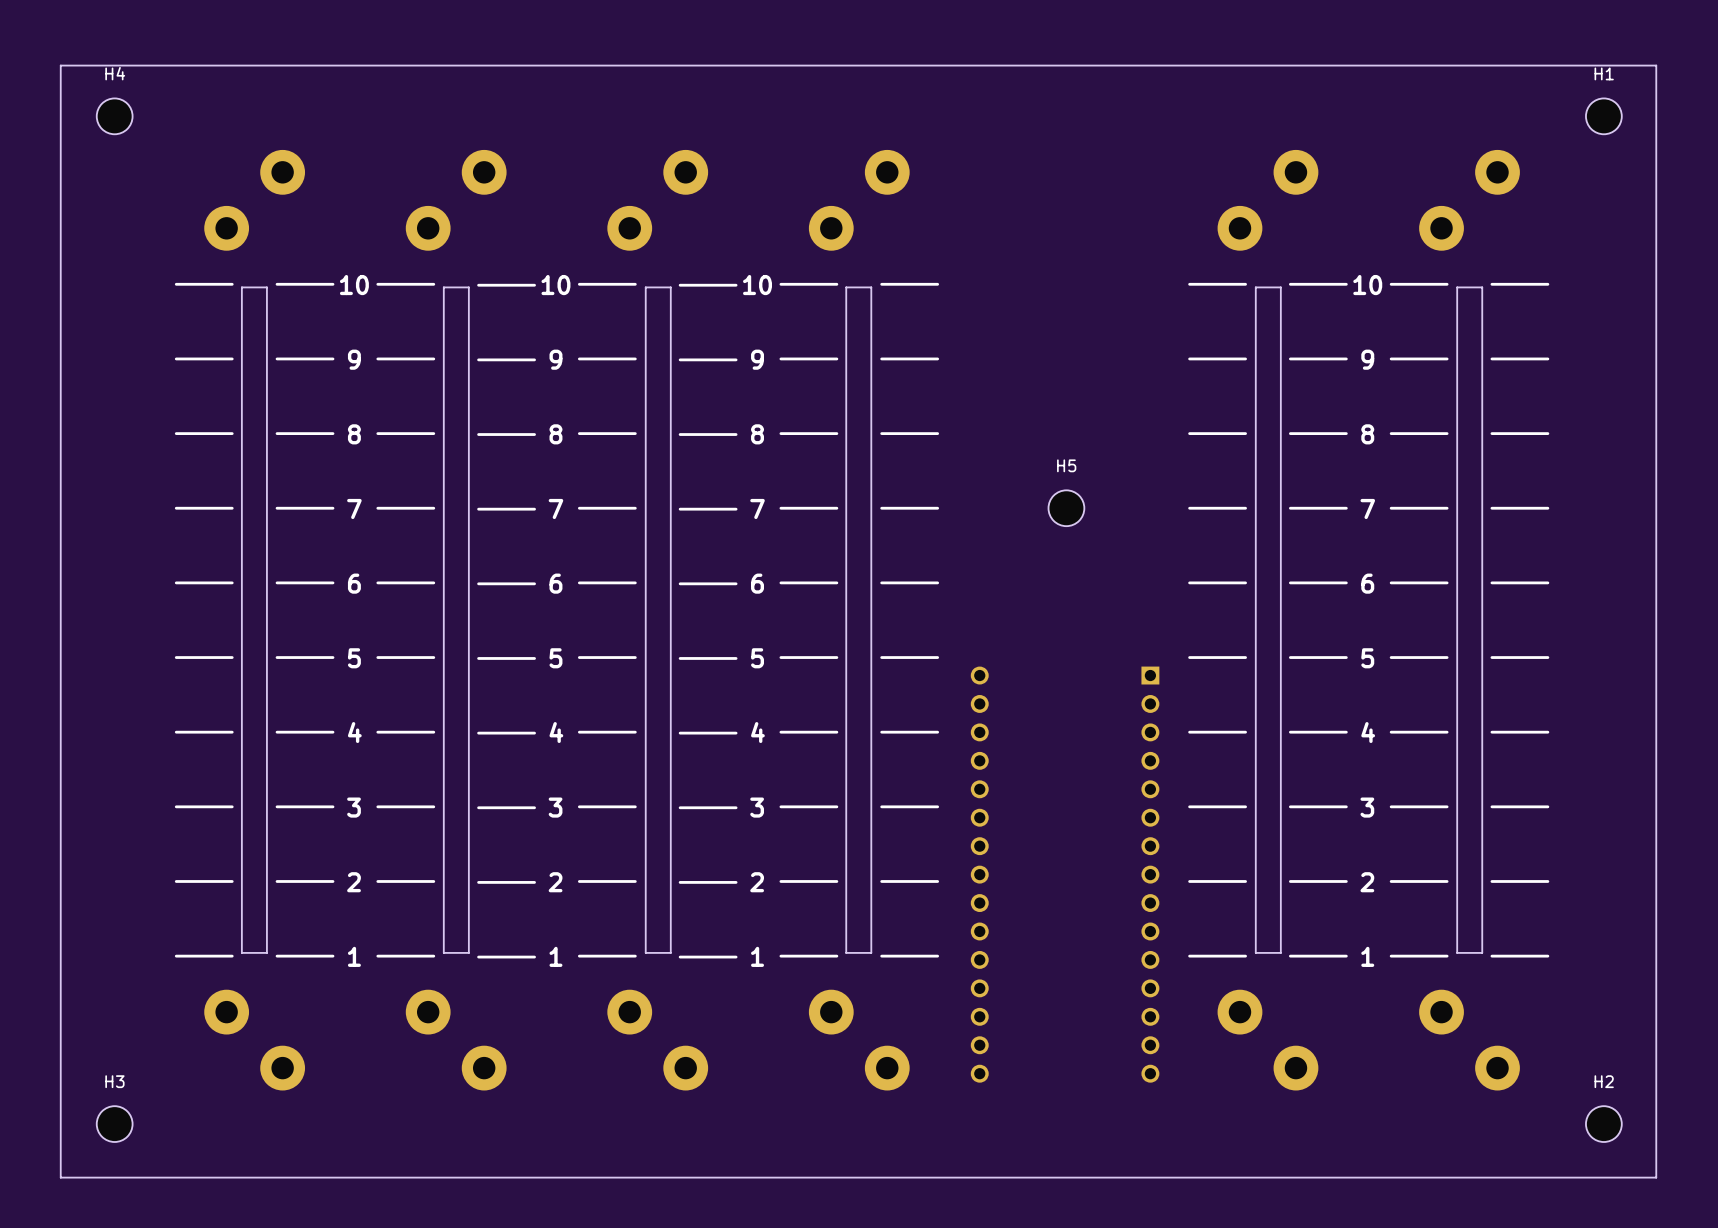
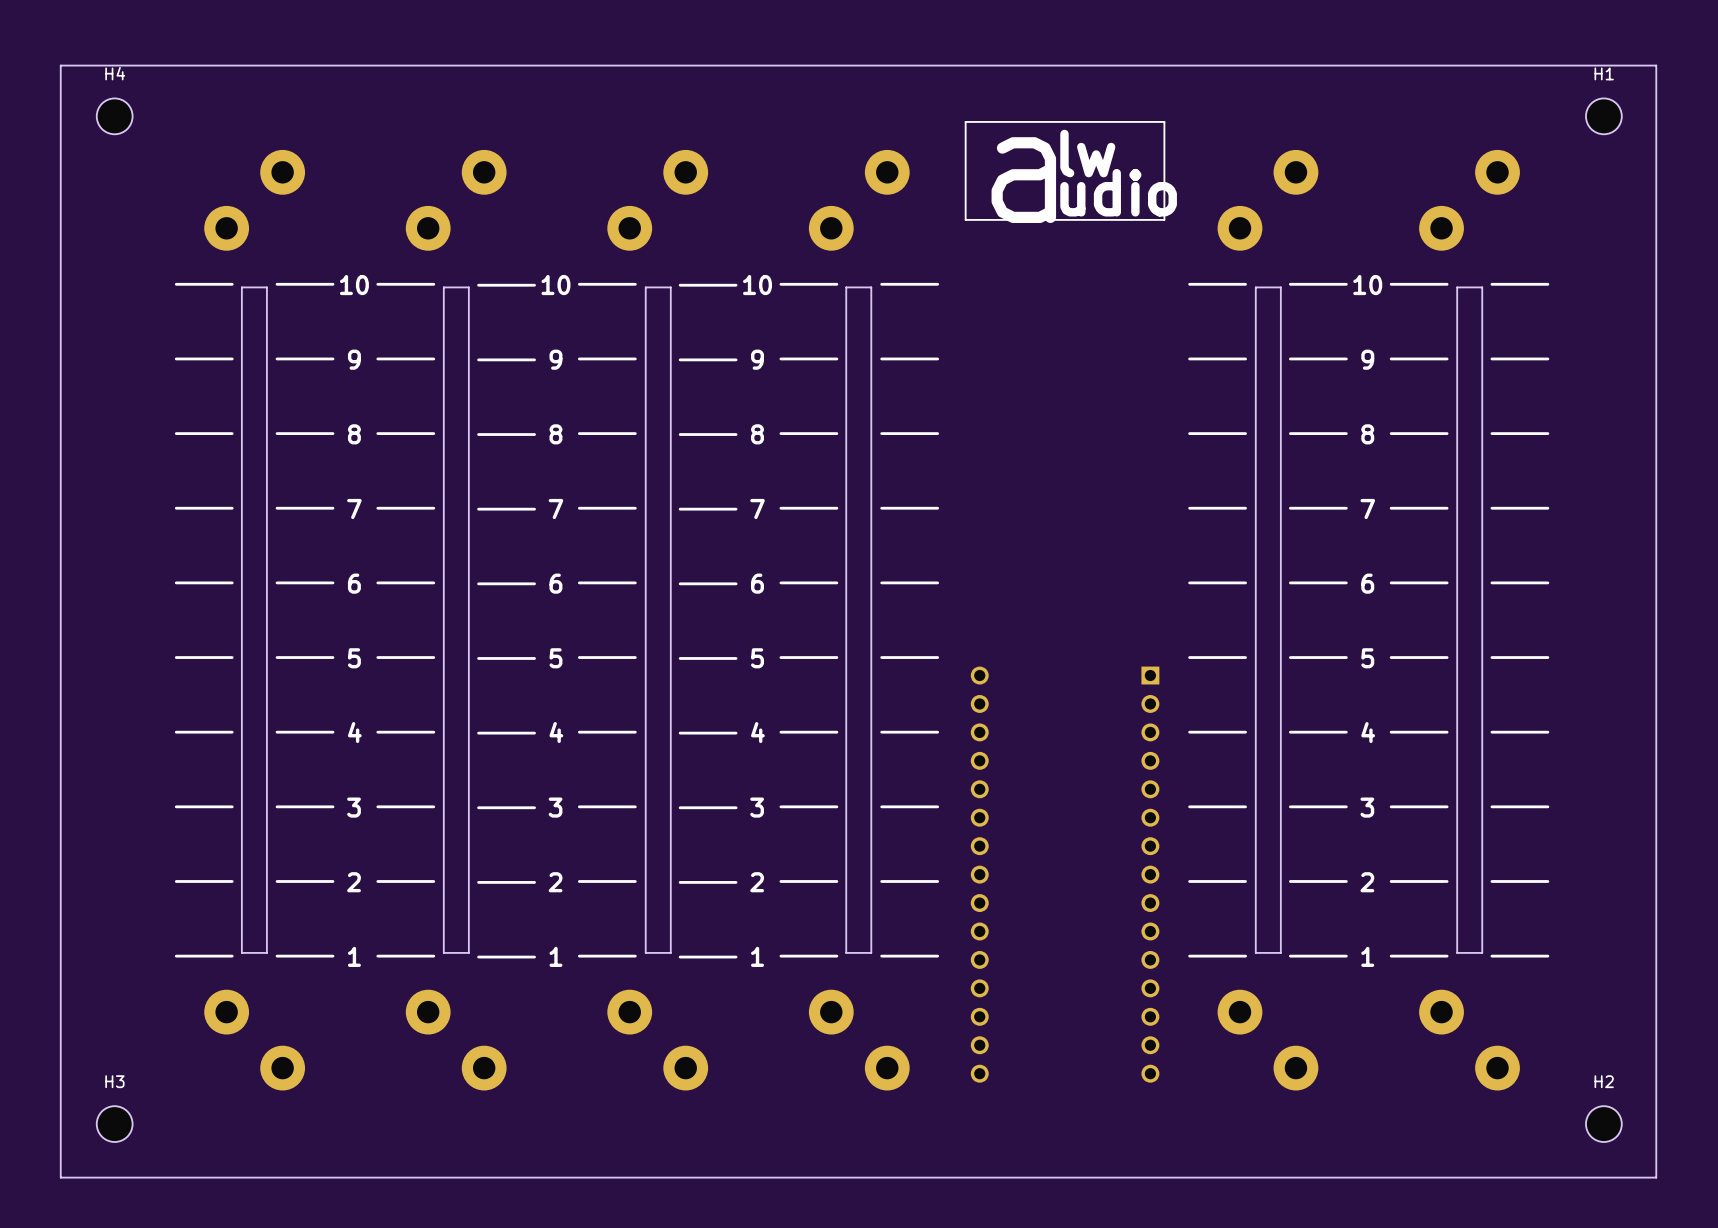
line: none -> (965, 121) (1164, 121) (1164, 219) (965, 219) (965, 121)
text: none -> lw (1087, 153)
text: none -> a (1023, 180)
text: none -> udio (1118, 192)
H5: (1066, 508) -> none

